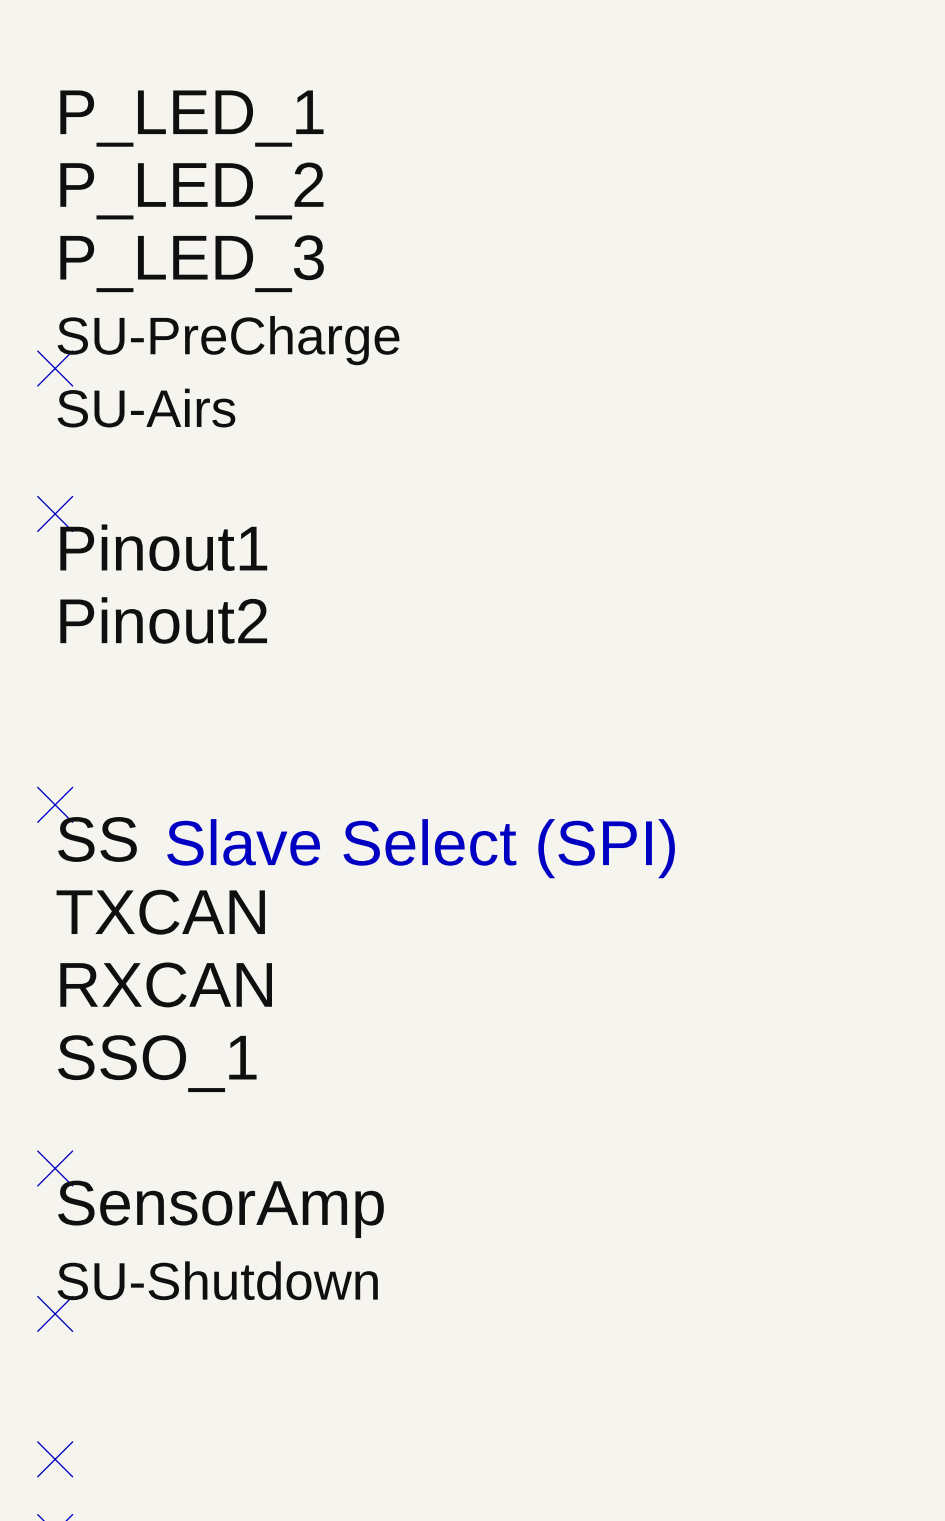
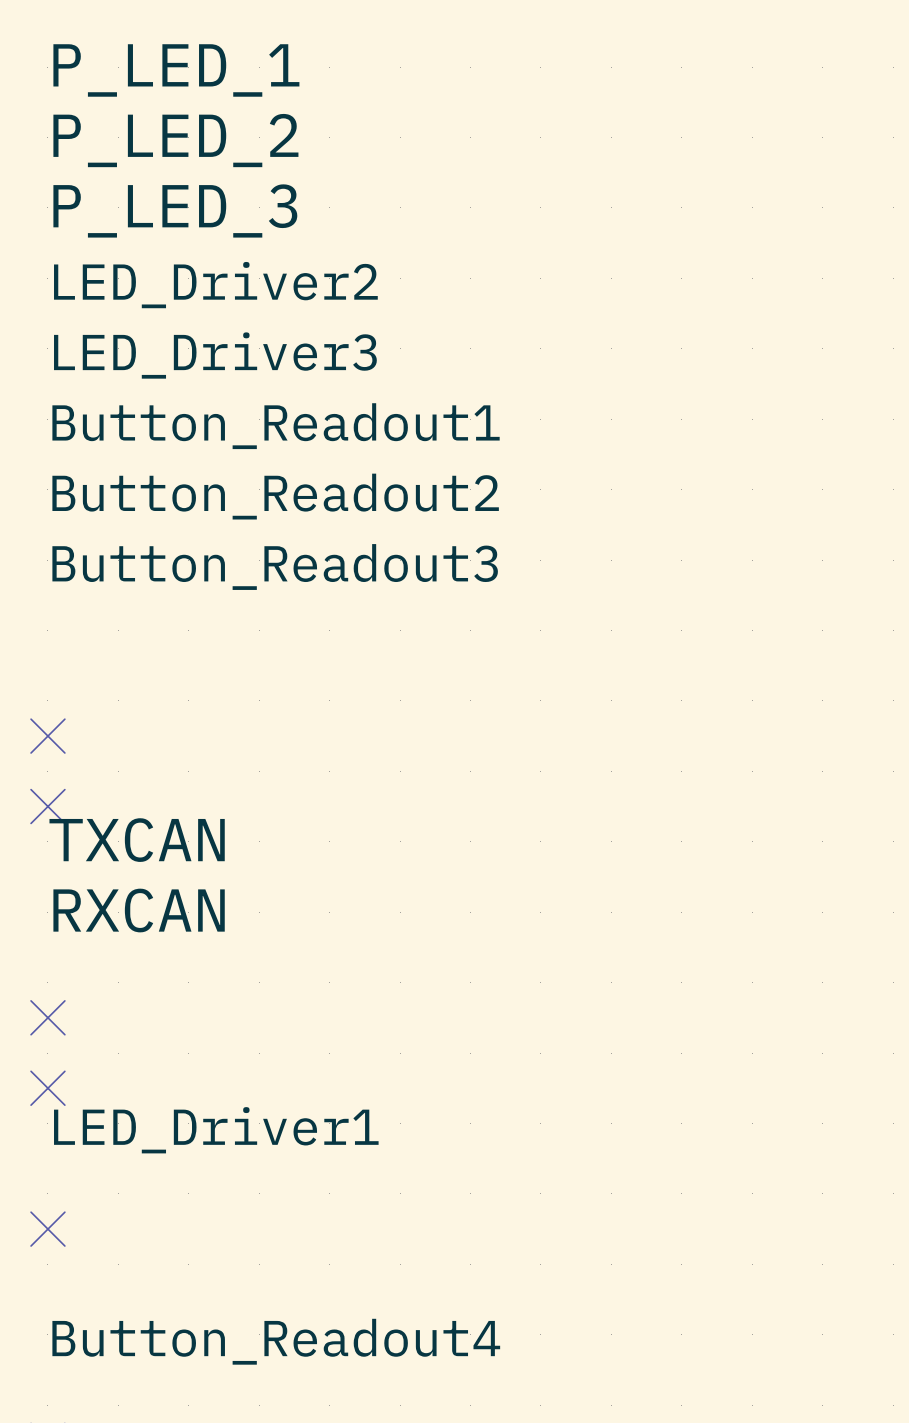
label: SU-PreCharge (228, 340) -> LED_Driver2 (215, 285)
no-connect mark: (55, 368) -> none
label: SU-Airs (146, 408) -> LED_Driver3 (215, 355)
label: none -> Button_Readout1 (276, 426)
no-connect mark: (55, 513) -> none
label: Pinout1 (163, 547) -> Button_Readout2 (275, 496)
label: Pinout2 (163, 620) -> Button_Readout3 (275, 567)
label: SS (97, 839) -> none
text: Slave Select (SPI) (421, 848) -> none
no-connect mark: none -> (47, 806)
label: SSO_1 (157, 1063) -> none
no-connect mark: none -> (47, 1017)
label: SensorAmp (220, 1209) -> LED_Driver1 (216, 1130)
label: SU-Shutdown (217, 1280) -> none
label: none -> Button_Readout4 (276, 1341)
no-connect mark: (55, 1459) -> none

